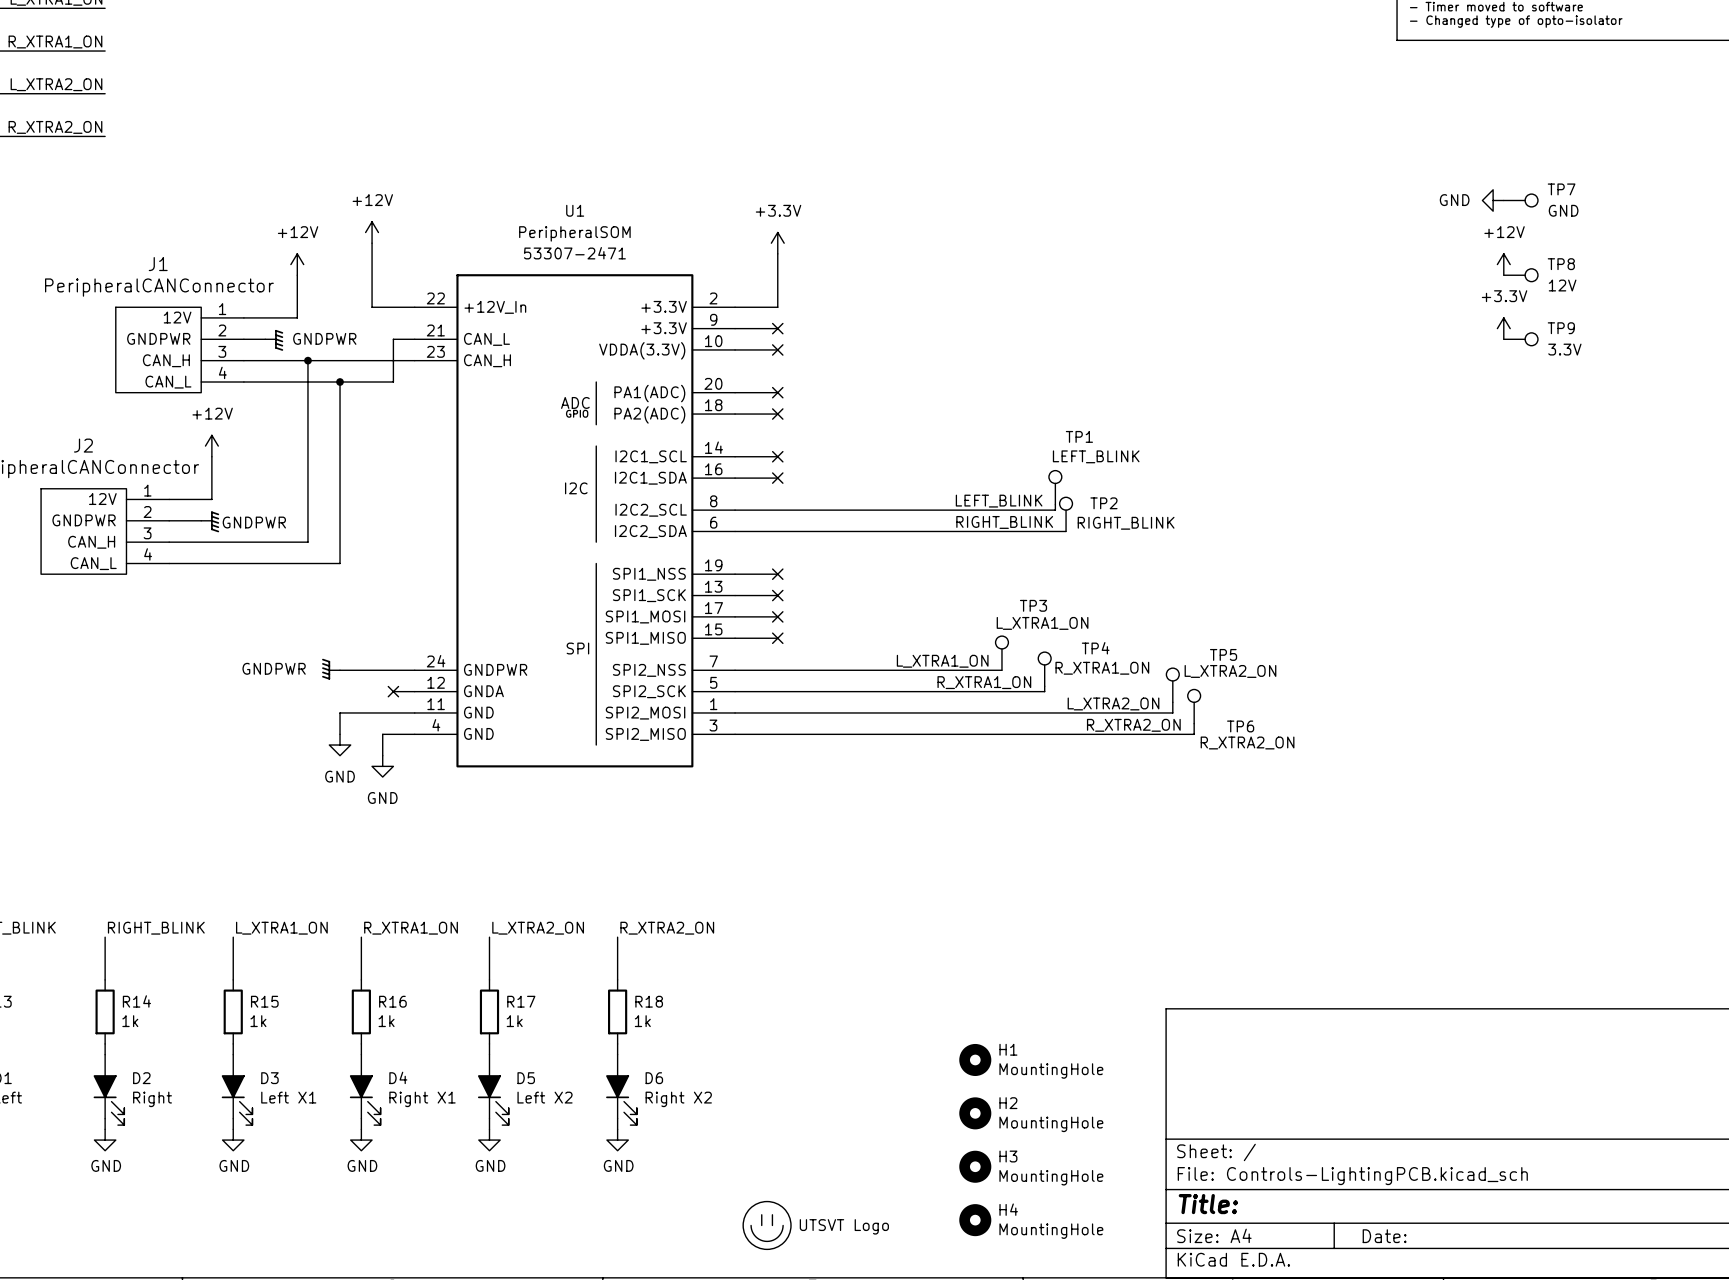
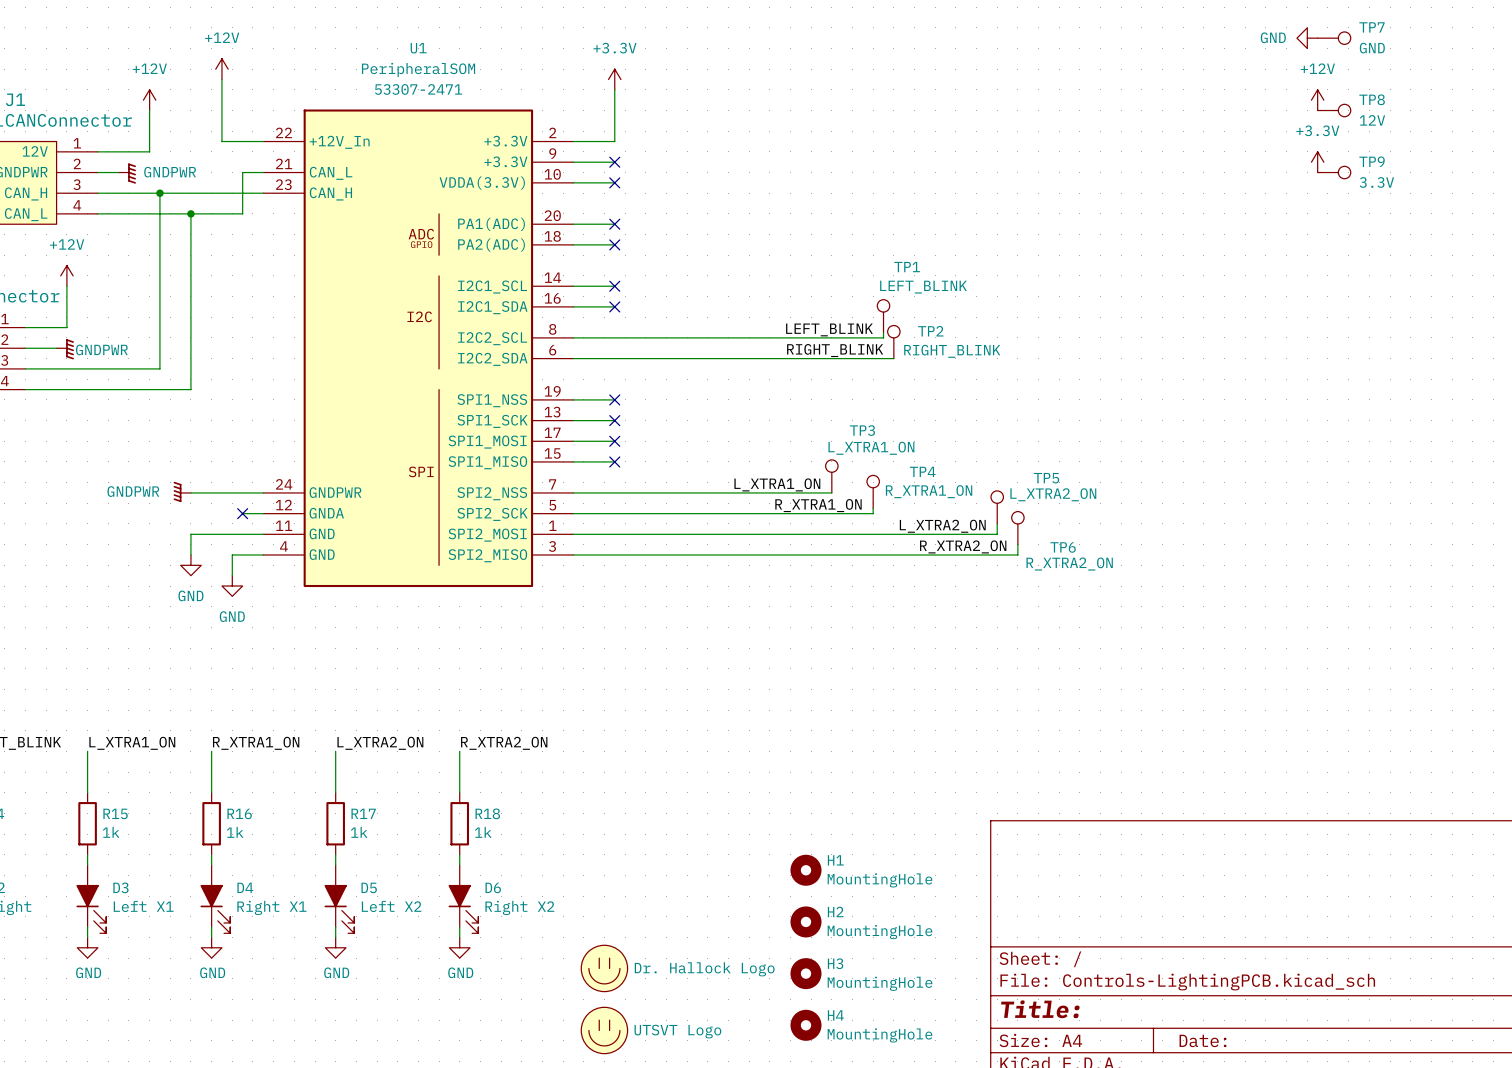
part: none -> Dr. Hallock Logo (604, 968)

